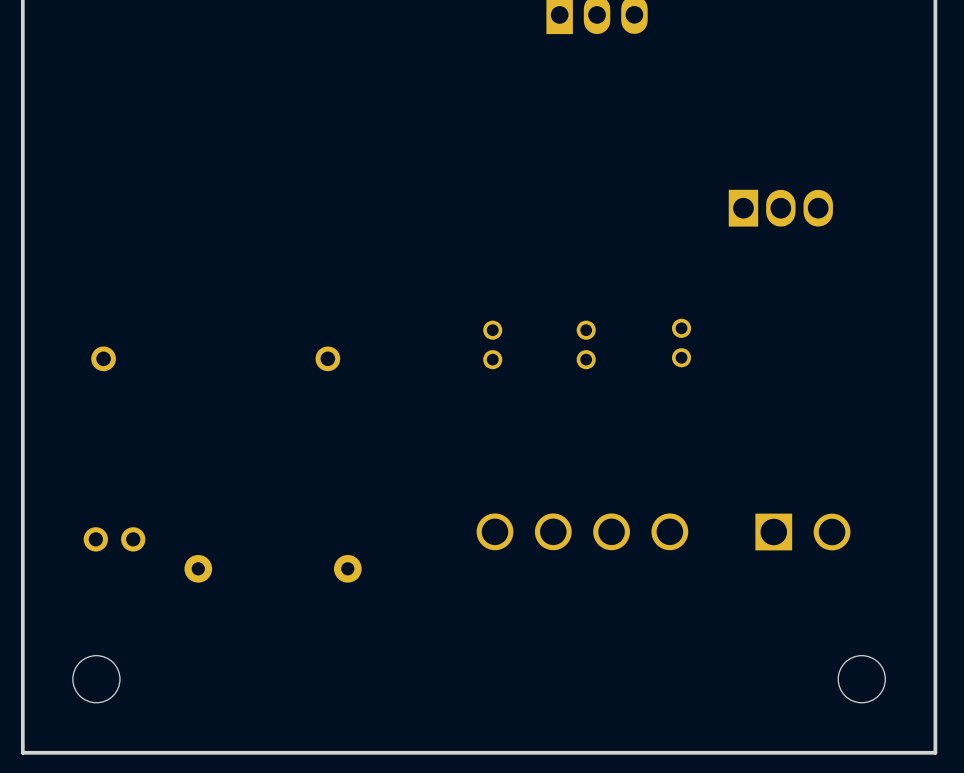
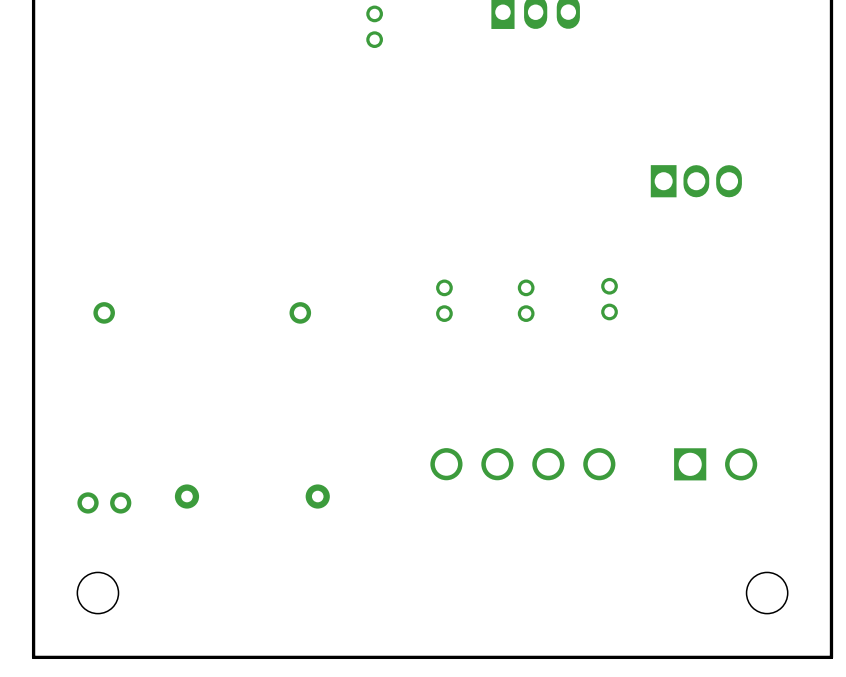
part: none -> (374, 26)
part position: (114, 539) -> (104, 502)

